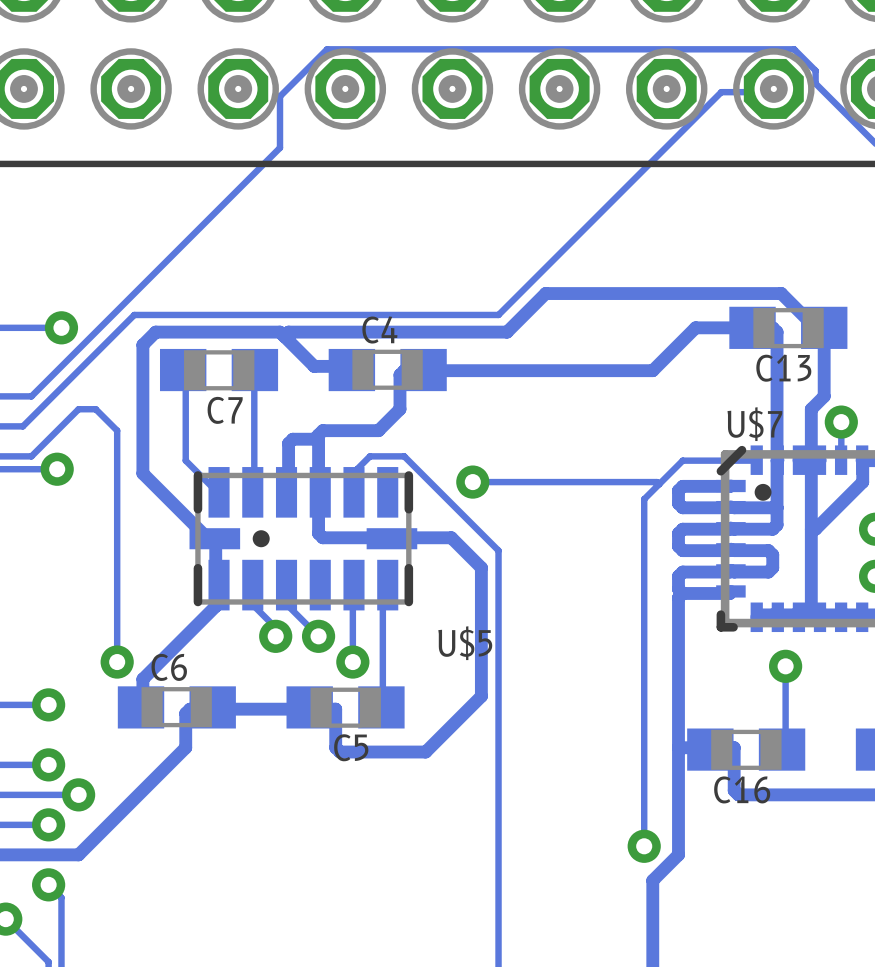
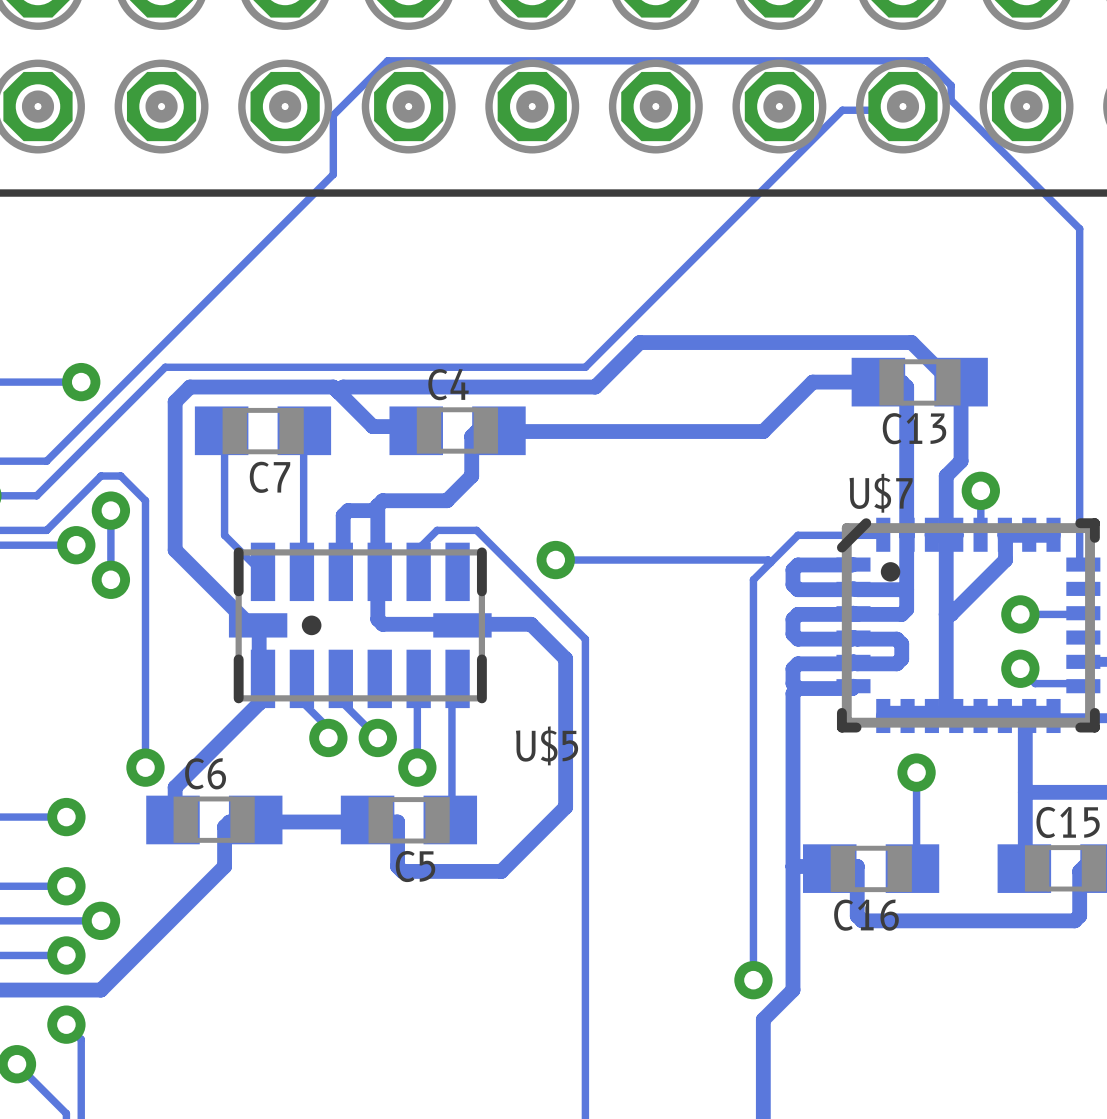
track: none -> (110, 510) (110, 579)
via: none -> (110, 510)
via: none -> (110, 579)

